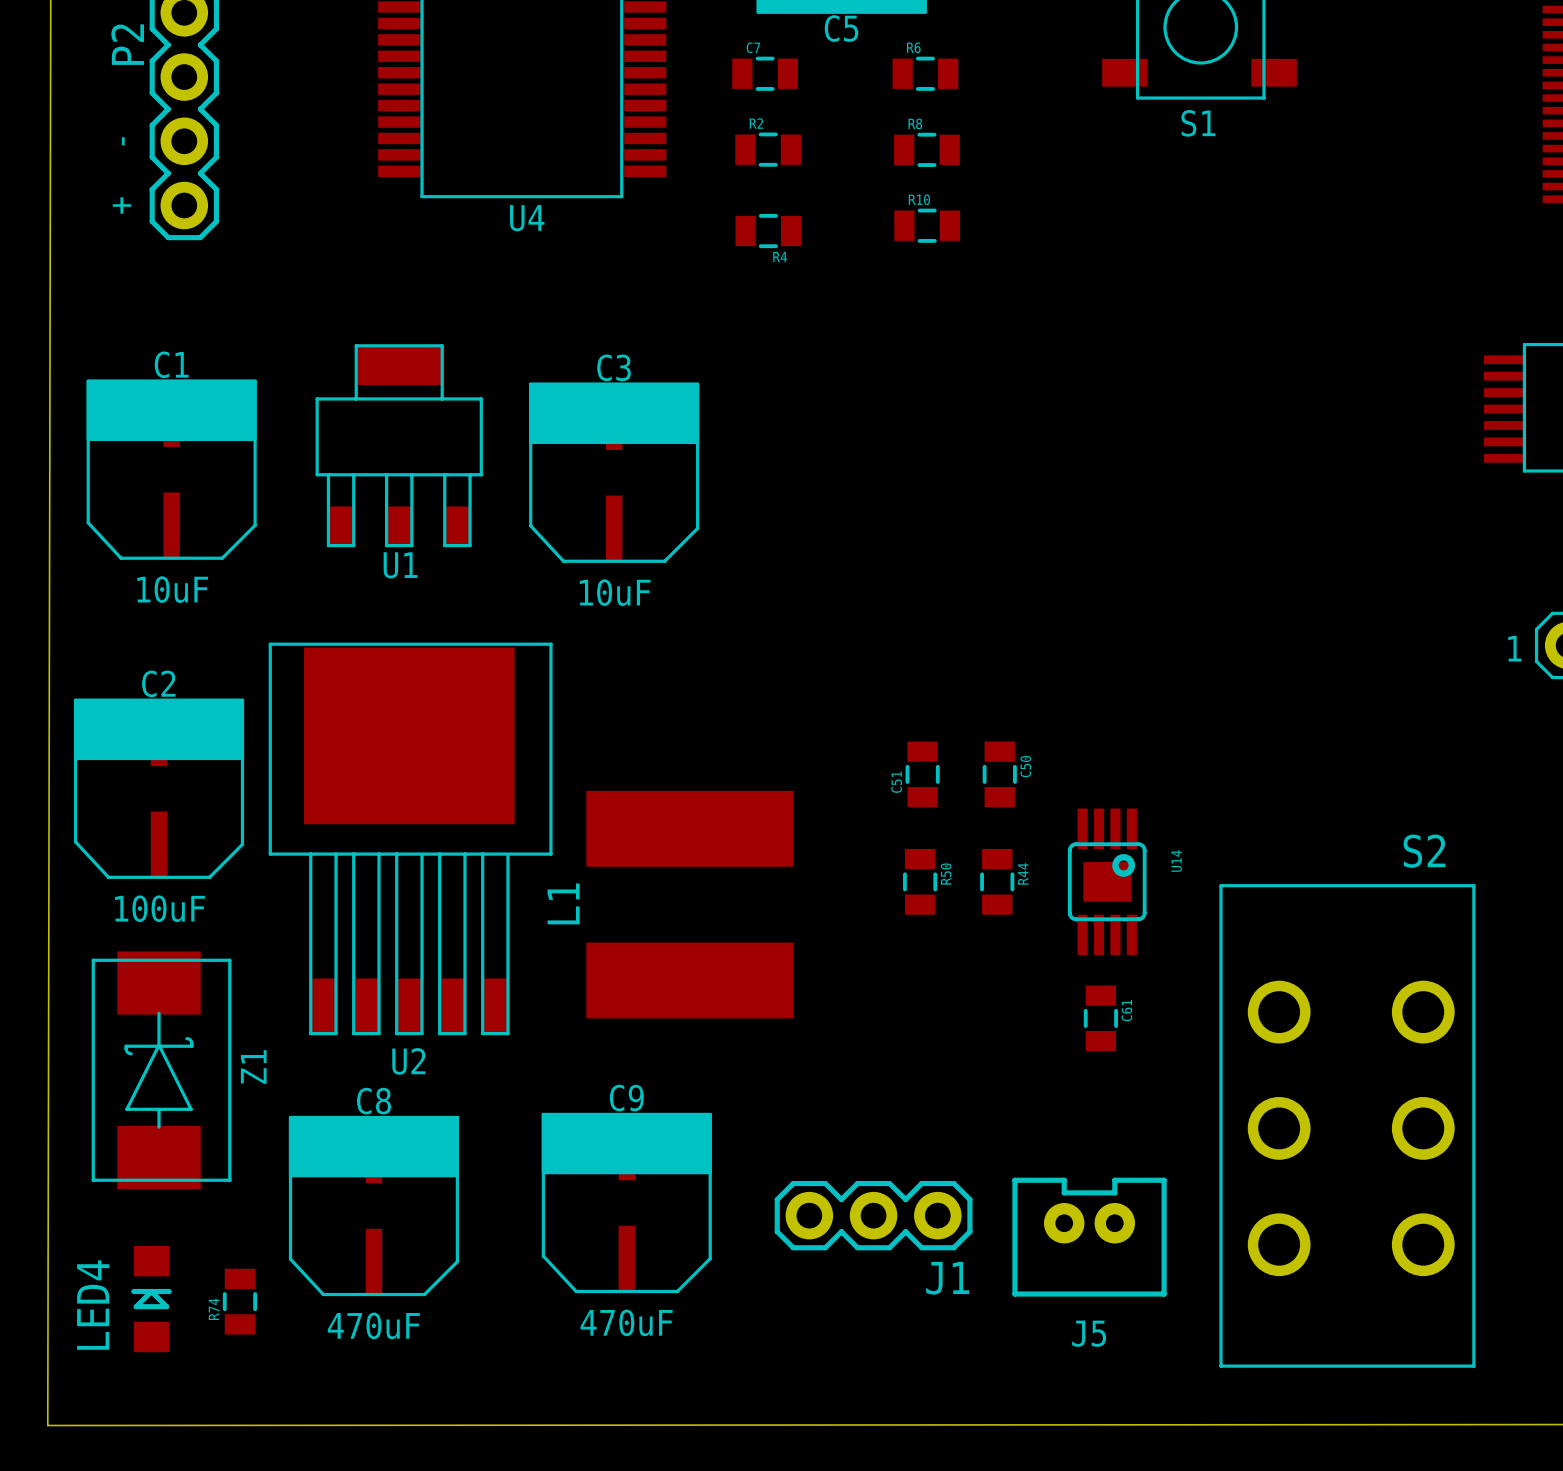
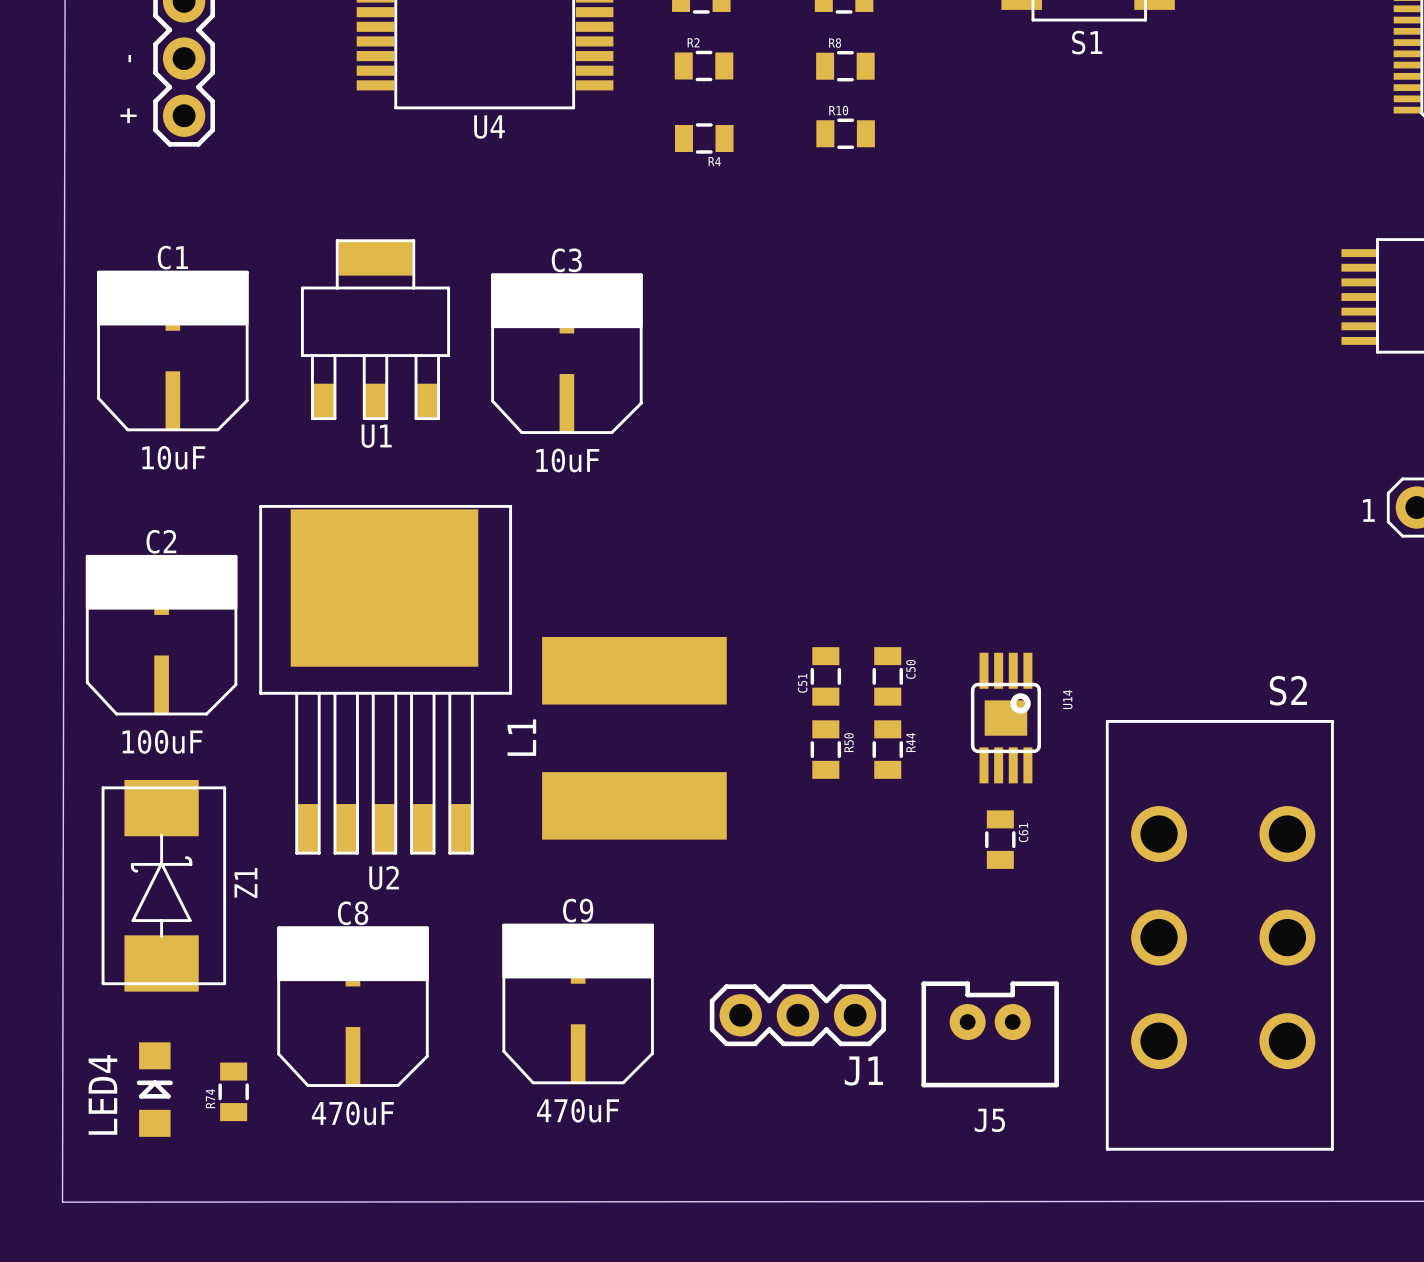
C51 position: (922, 774) -> (825, 676)
C50 position: (999, 774) -> (887, 676)
R50 position: (920, 881) -> (825, 749)
R44 position: (997, 881) -> (887, 749)

